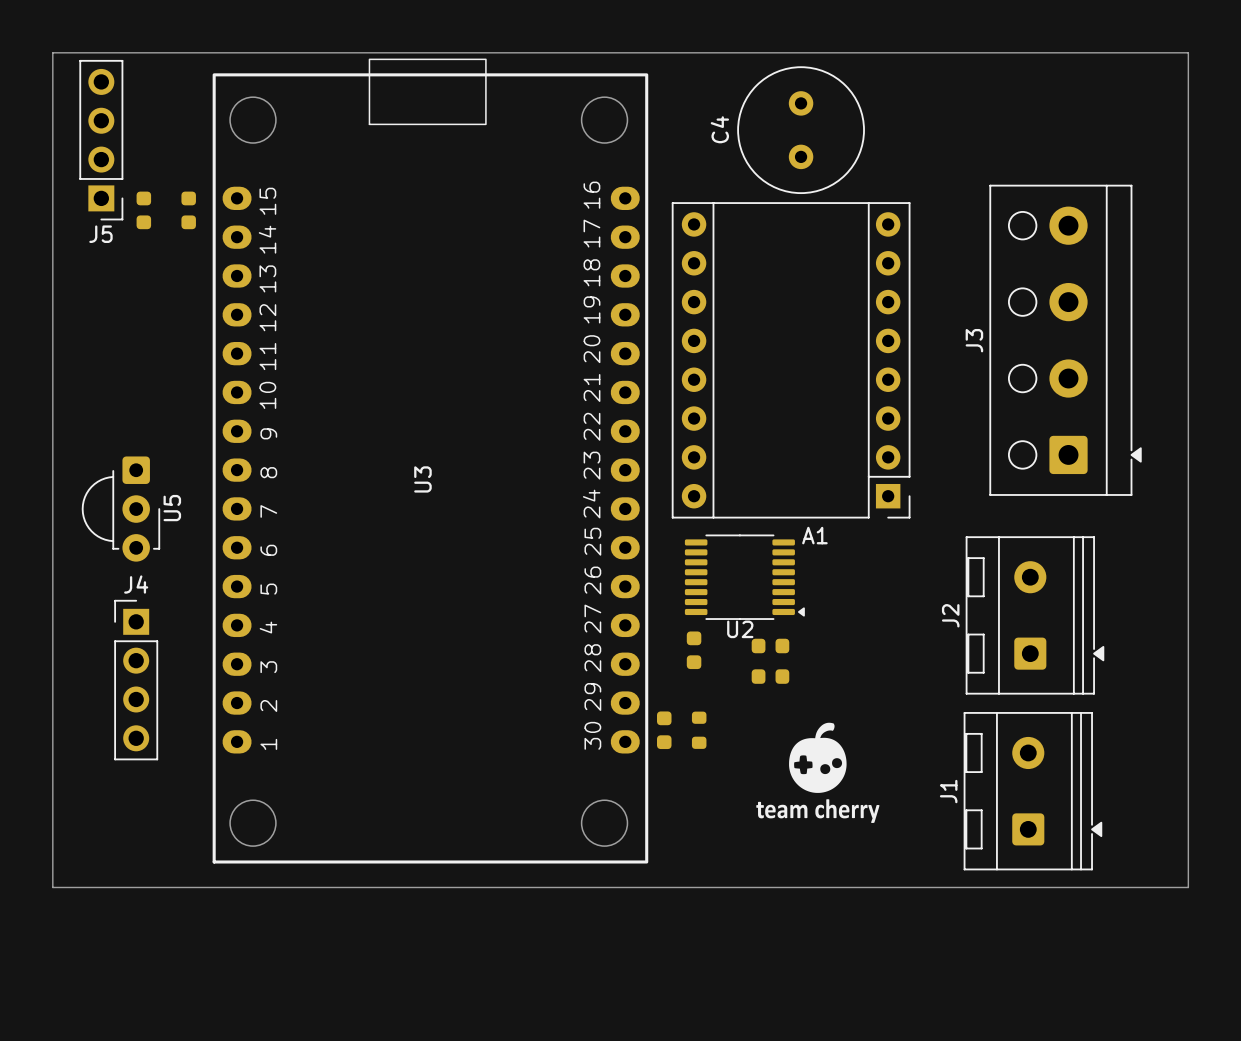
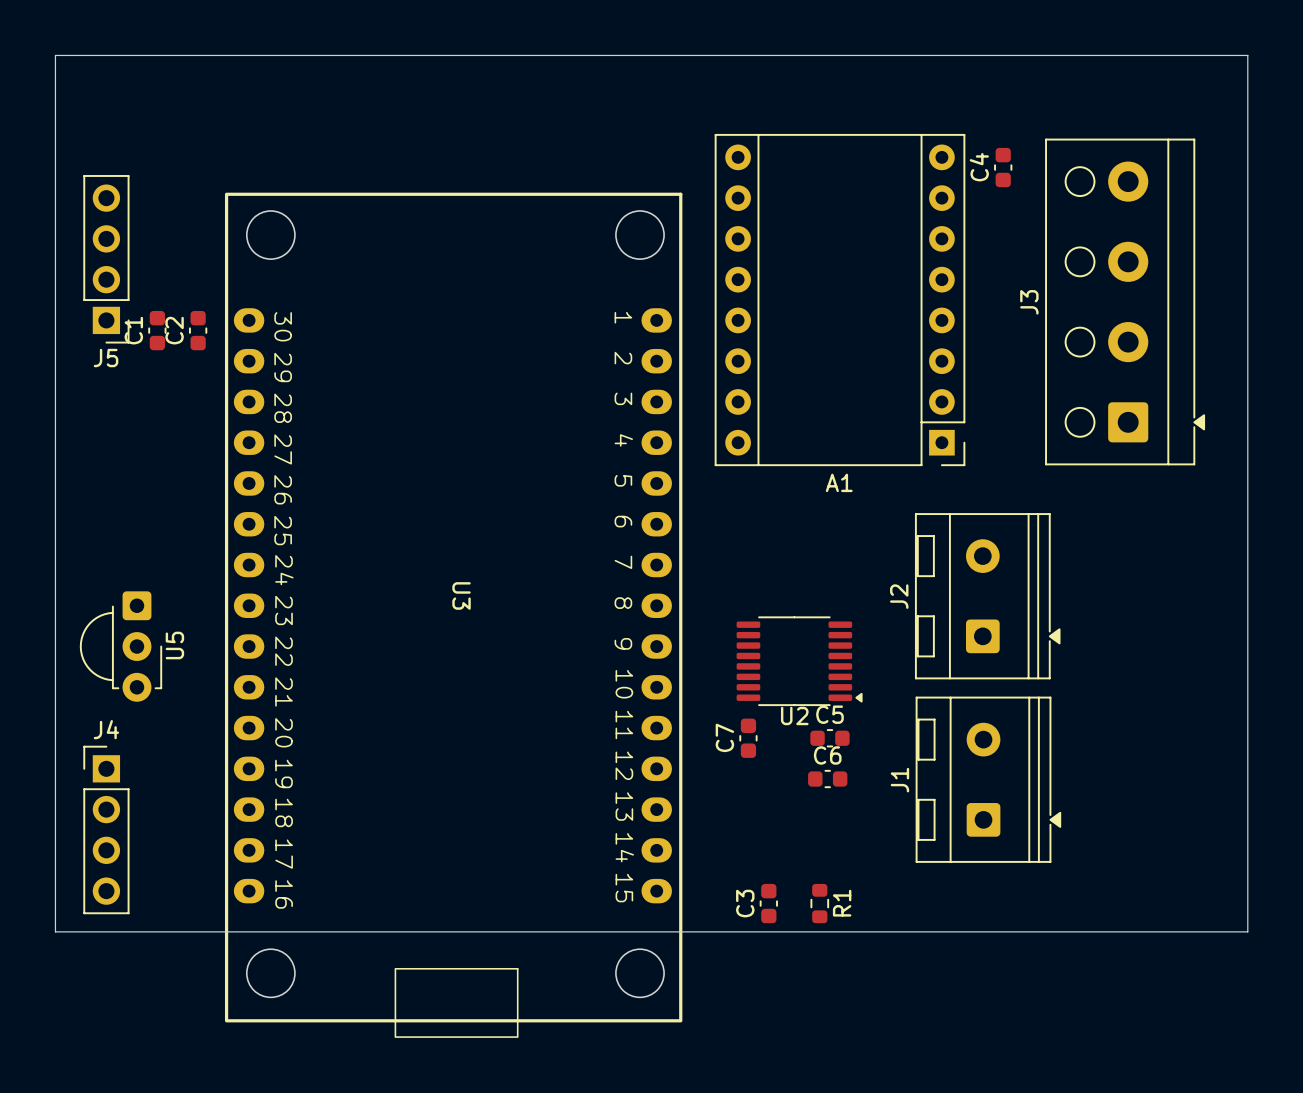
C4 footprint: [737, 66, 865, 195] -> [994, 147, 1013, 188]
C4 name position: C4 (719, 129) -> C4 (979, 167)
J5 position: (101, 140) -> (106, 259)
part: (143, 210) -> none
part: (188, 210) -> none
C1: none -> (157, 330)
C2: none -> (198, 330)
J3 position: (1065, 340) -> (1125, 301)
A1 position: (791, 360) -> (840, 300)
U3 rotation: 0° (430, 461) -> 180° (453, 615)
U5 position: (120, 509) -> (120, 646)
A1 name position: A1 (814, 535) -> A1 (839, 482)
U2 position: (744, 577) -> (799, 661)
J2 position: (1034, 615) -> (987, 596)
part: (770, 645) -> none
part: (694, 650) -> none
part: (770, 676) -> none
J4 position: (136, 680) -> (106, 829)
C7: none -> (748, 738)
C5: none -> (829, 738)
drawing: [756, 722, 880, 823] -> none
part: (664, 730) -> none
part: (699, 730) -> none
C6: none -> (827, 779)
J1 position: (1032, 791) -> (988, 779)
C3: none -> (768, 903)
R1: none -> (819, 903)

